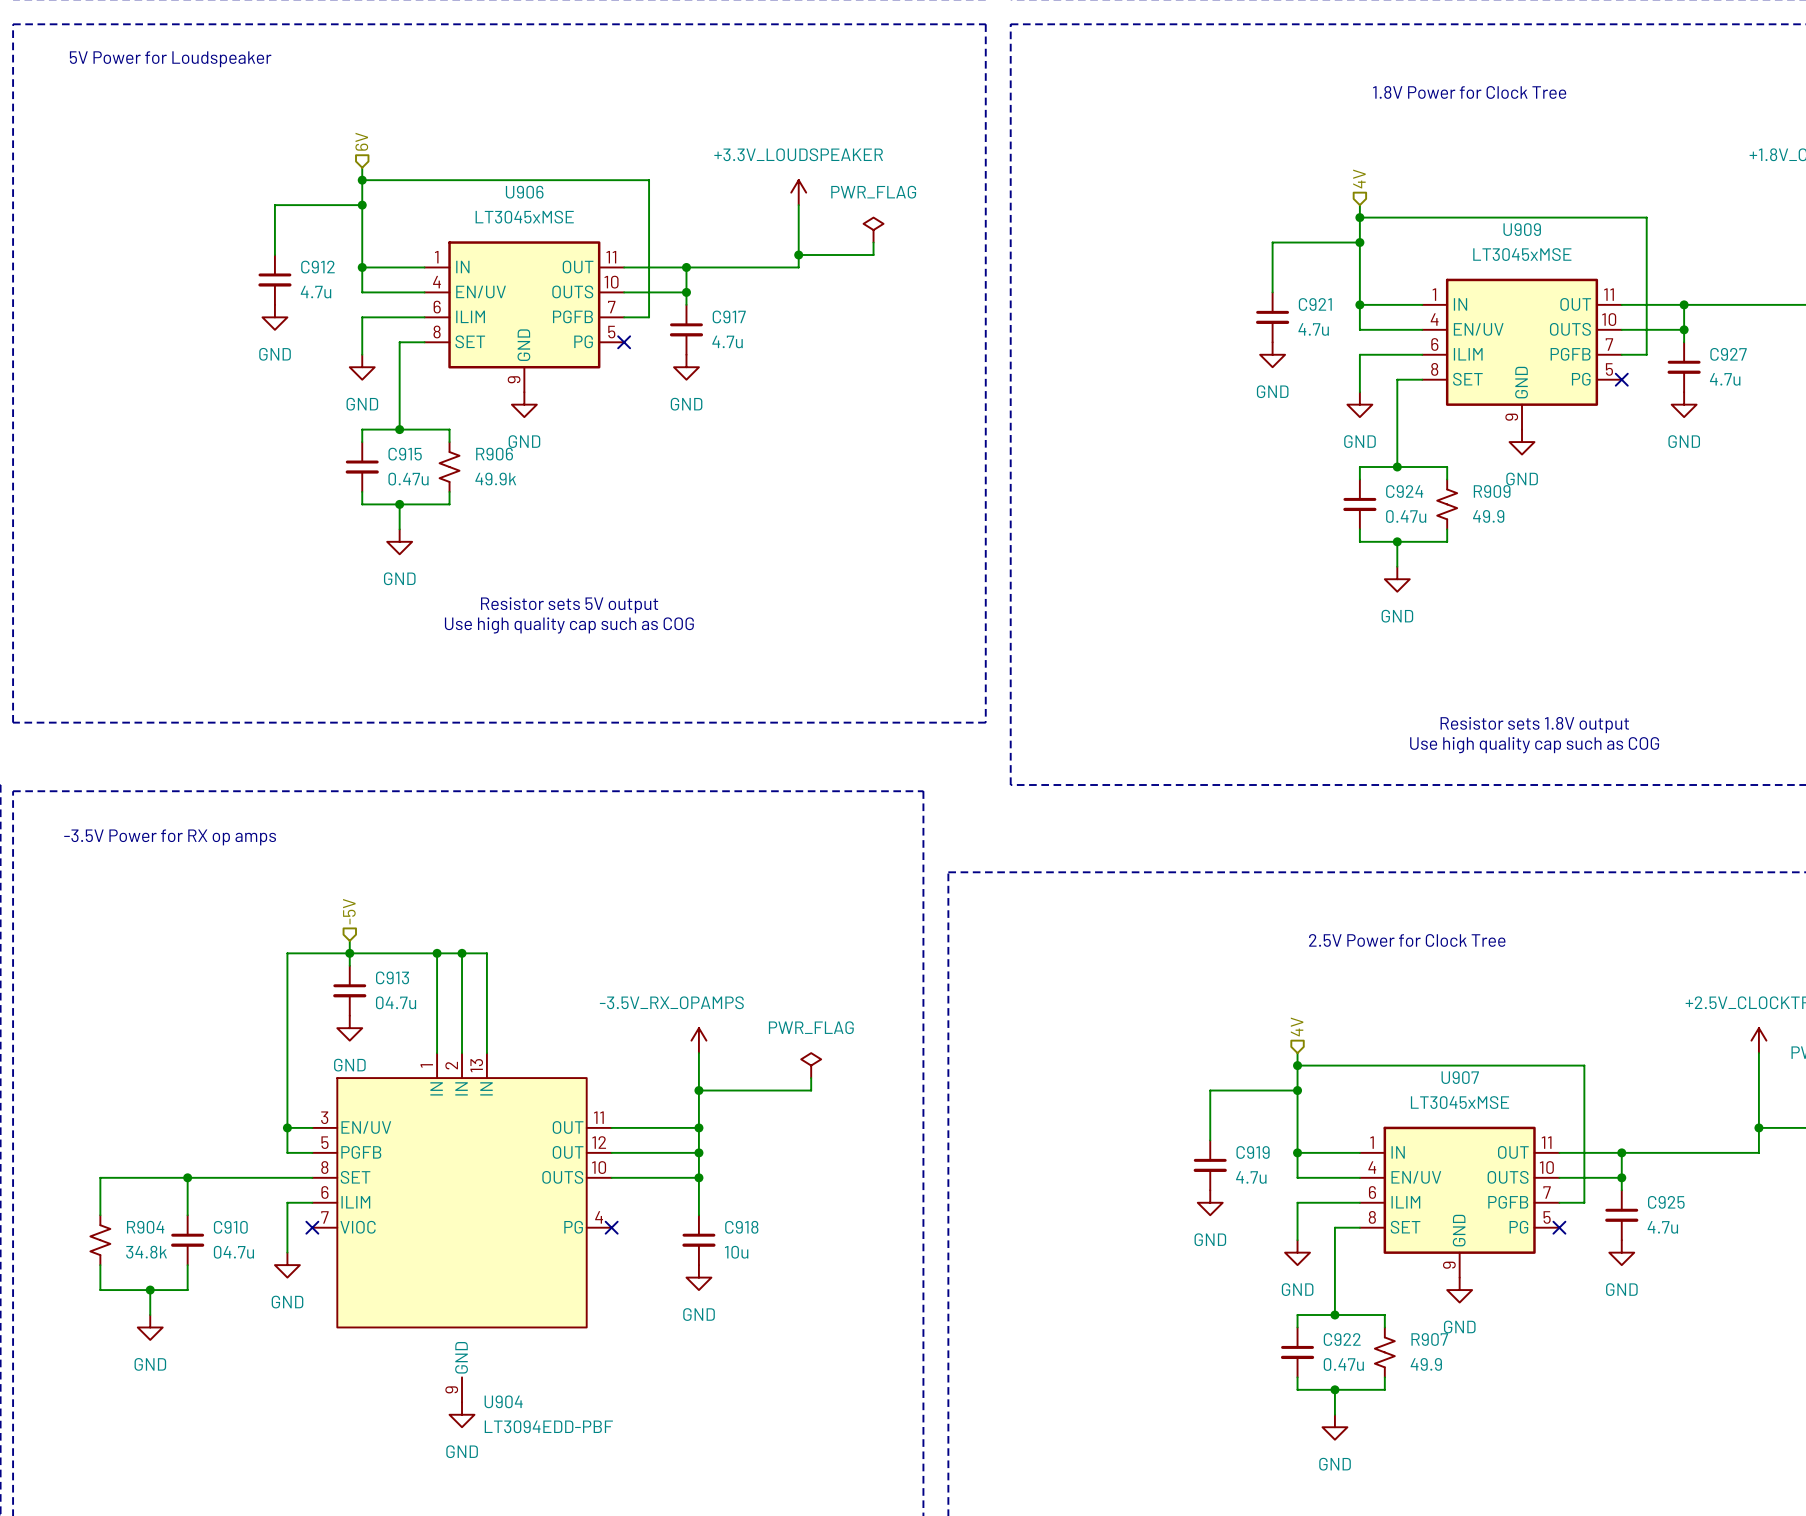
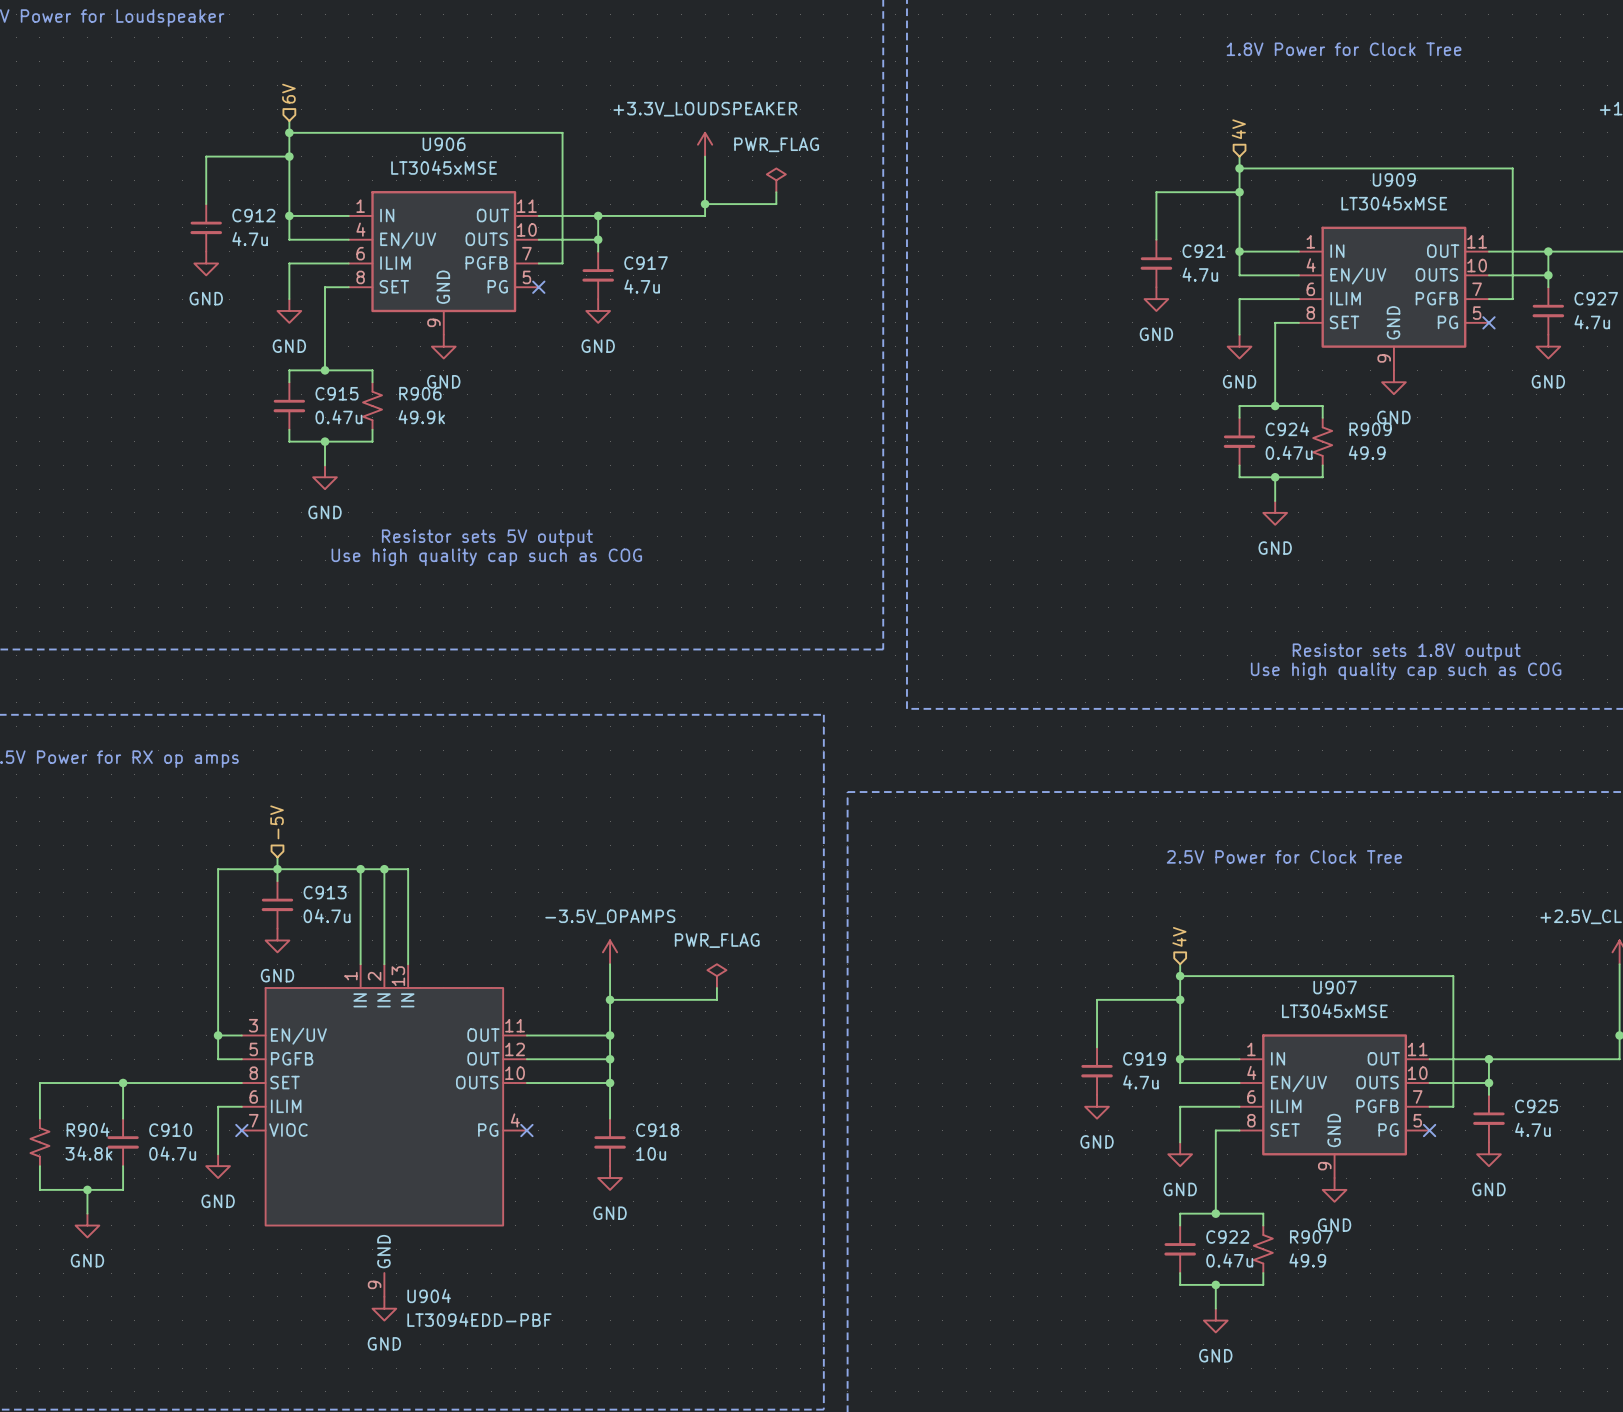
power symbol: -3.5V_RX_OPAMPS (698, 1040) -> -3.5V_OPAMPS (610, 952)

